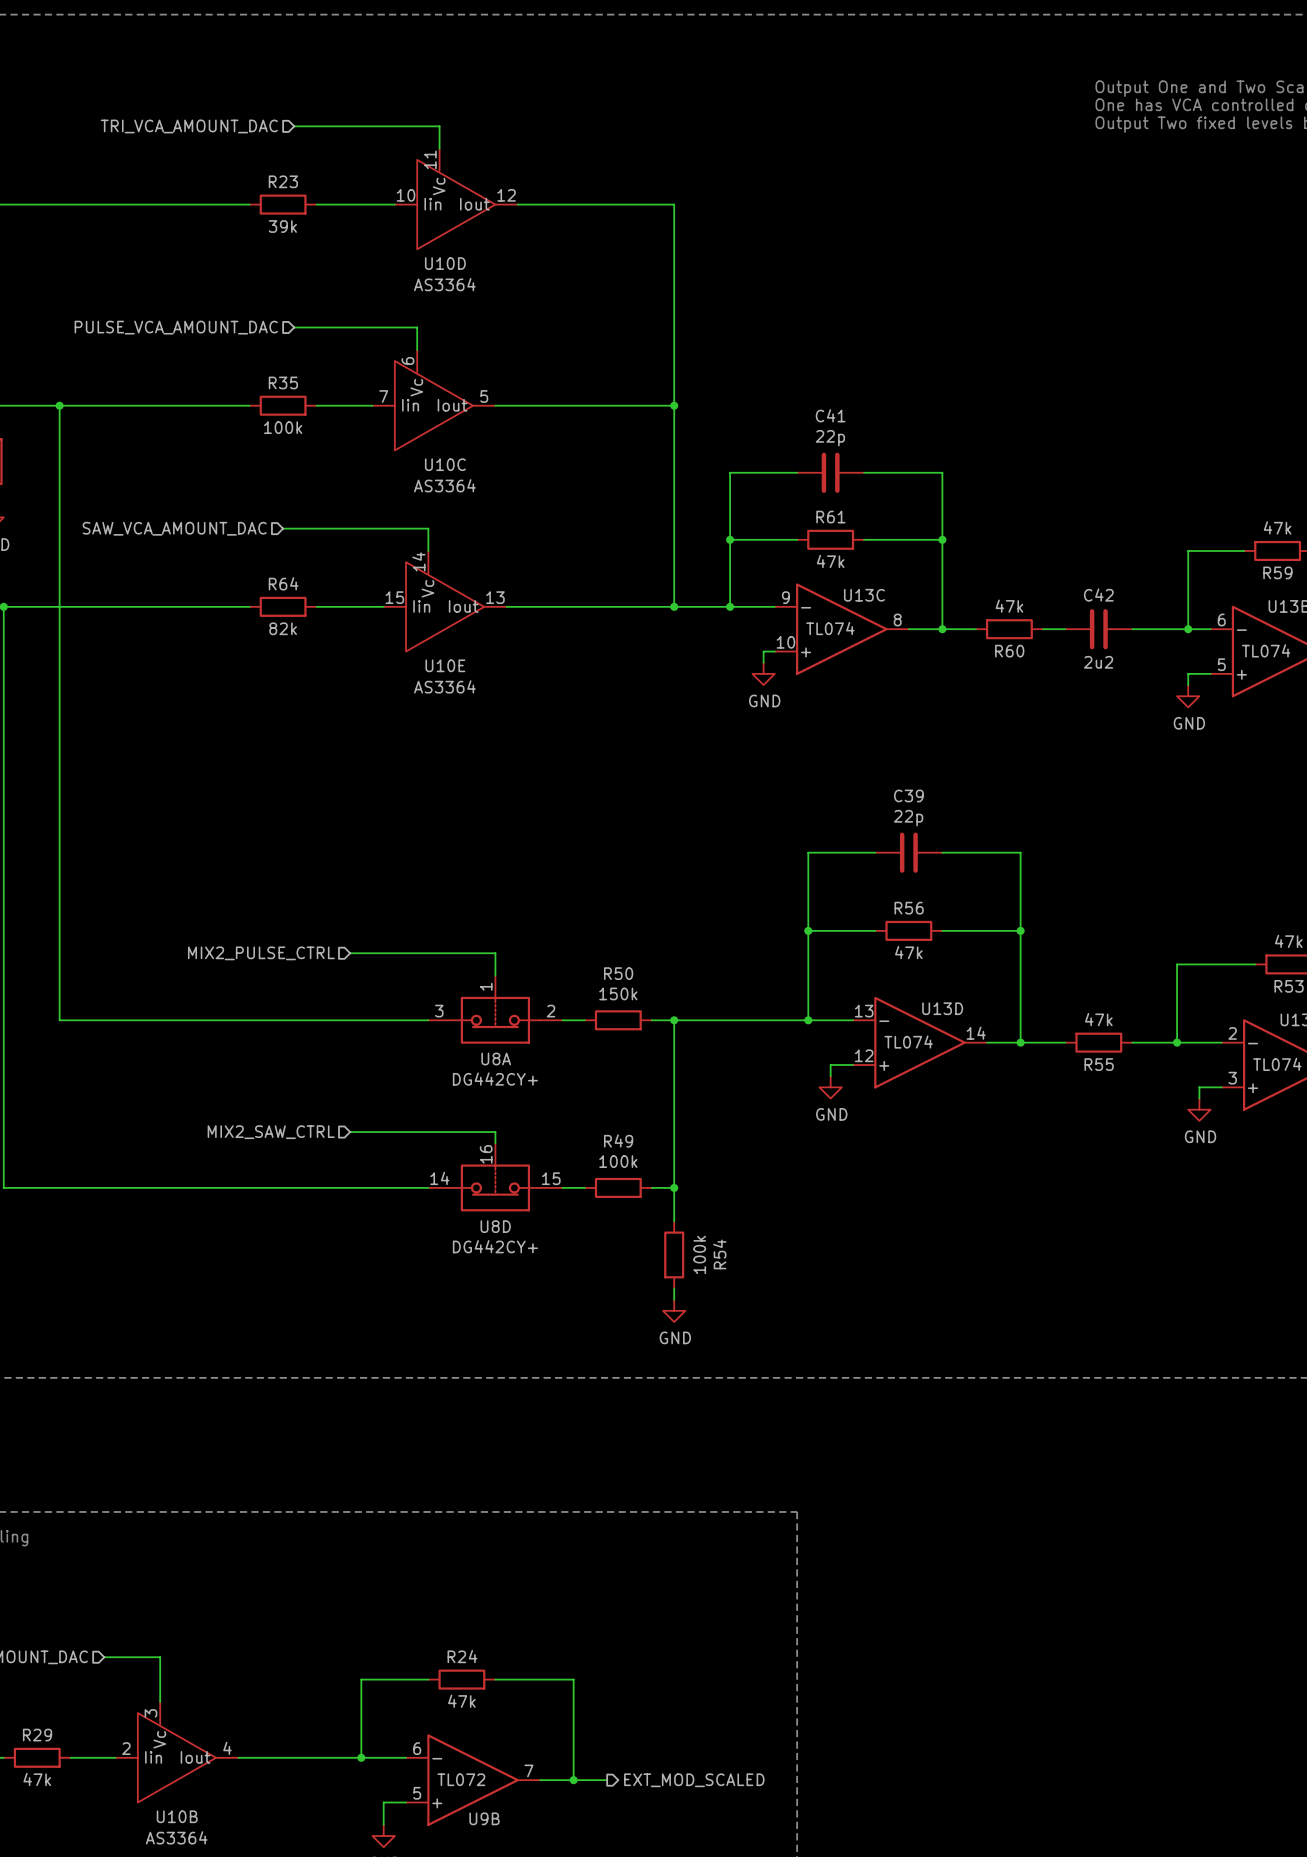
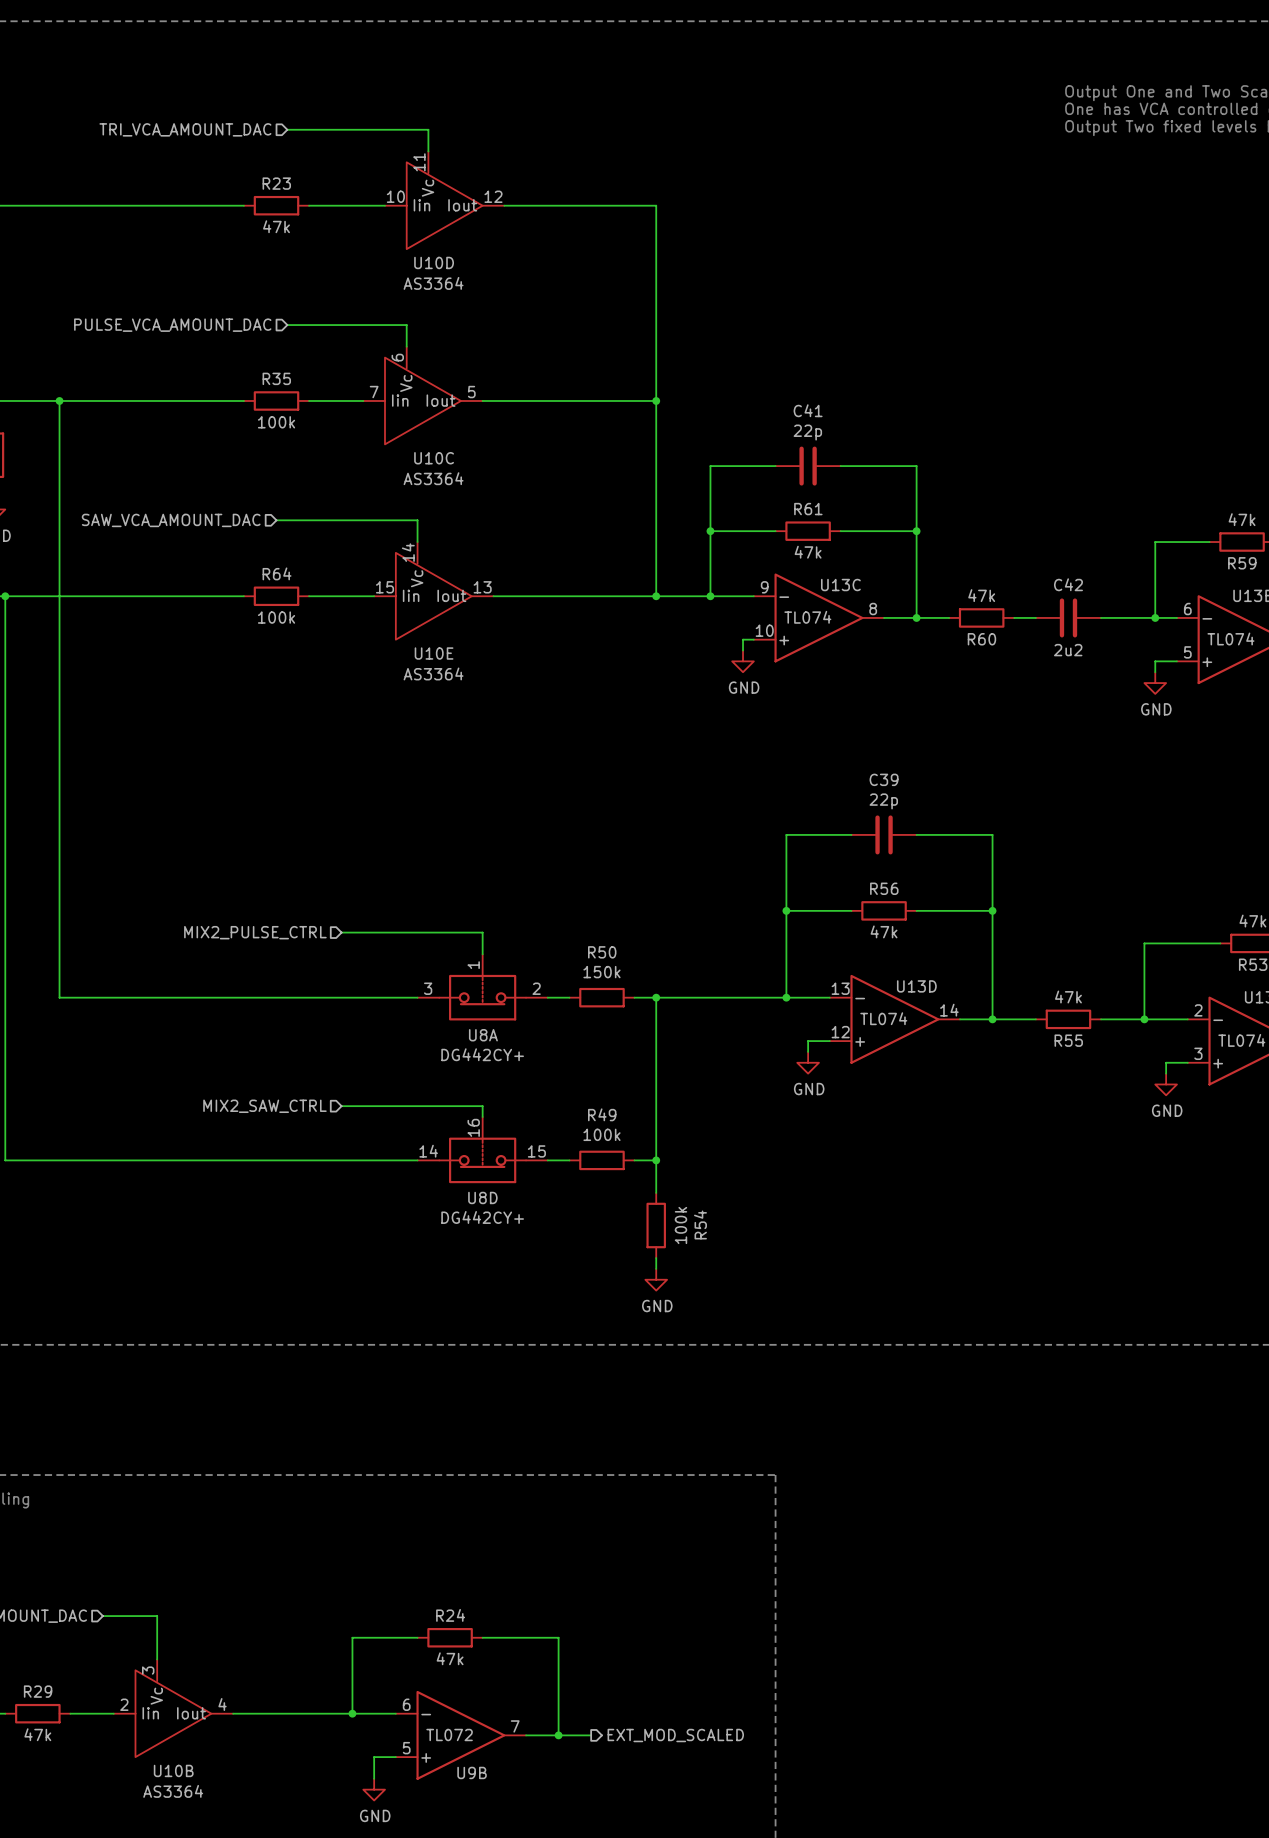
R23 value: 39k (282, 226) -> 47k (276, 226)
R64 value: 82k (283, 628) -> 100k (276, 617)

